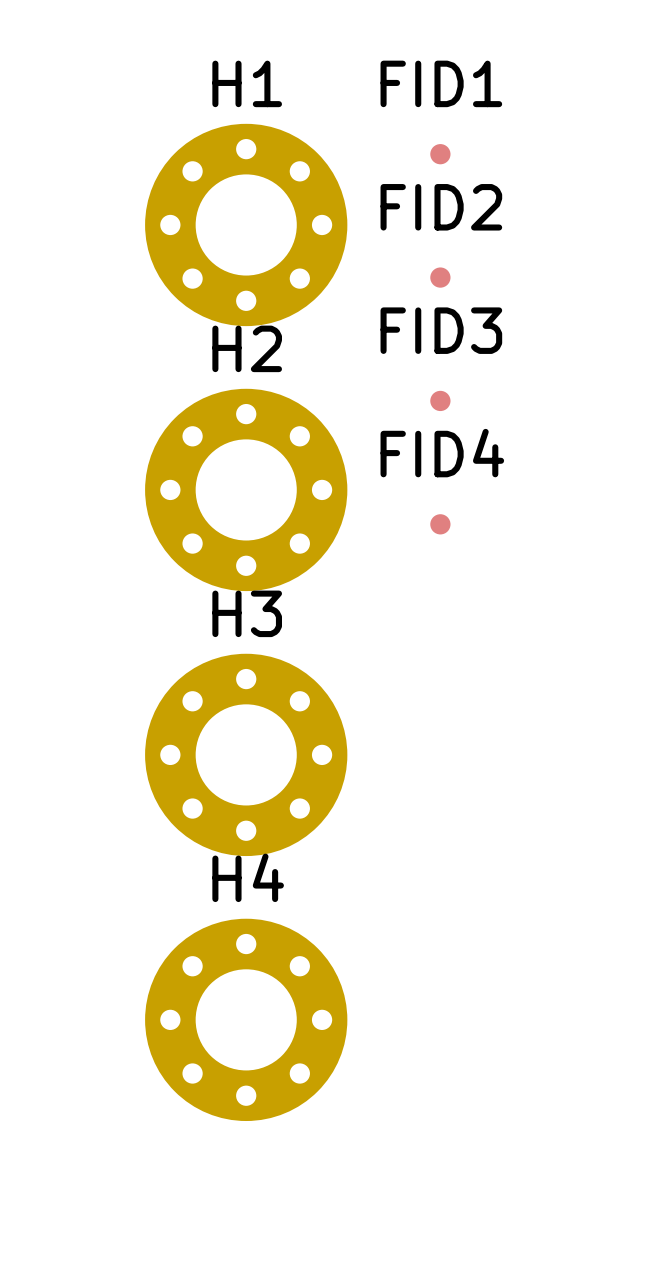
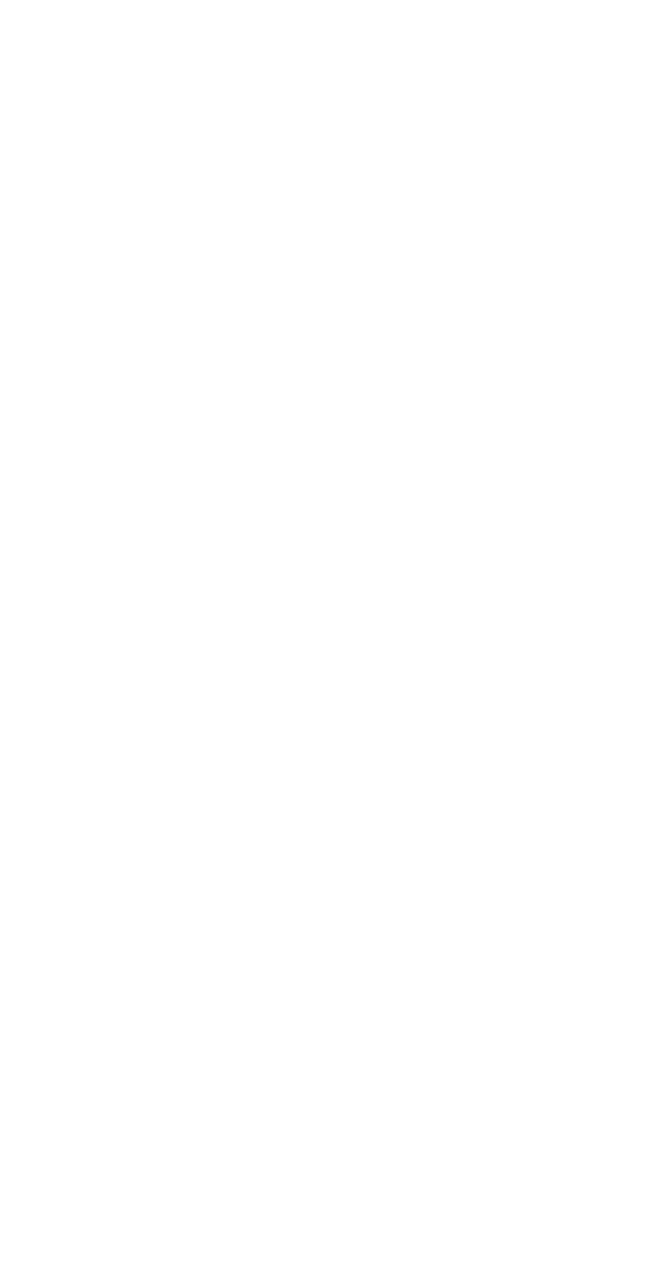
FID1: (440, 154) -> none
H1: (246, 224) -> none
FID2: (440, 277) -> none
FID3: (440, 400) -> none
H2: (246, 489) -> none
FID4: (440, 524) -> none
H3: (246, 754) -> none
H4: (246, 1019) -> none

